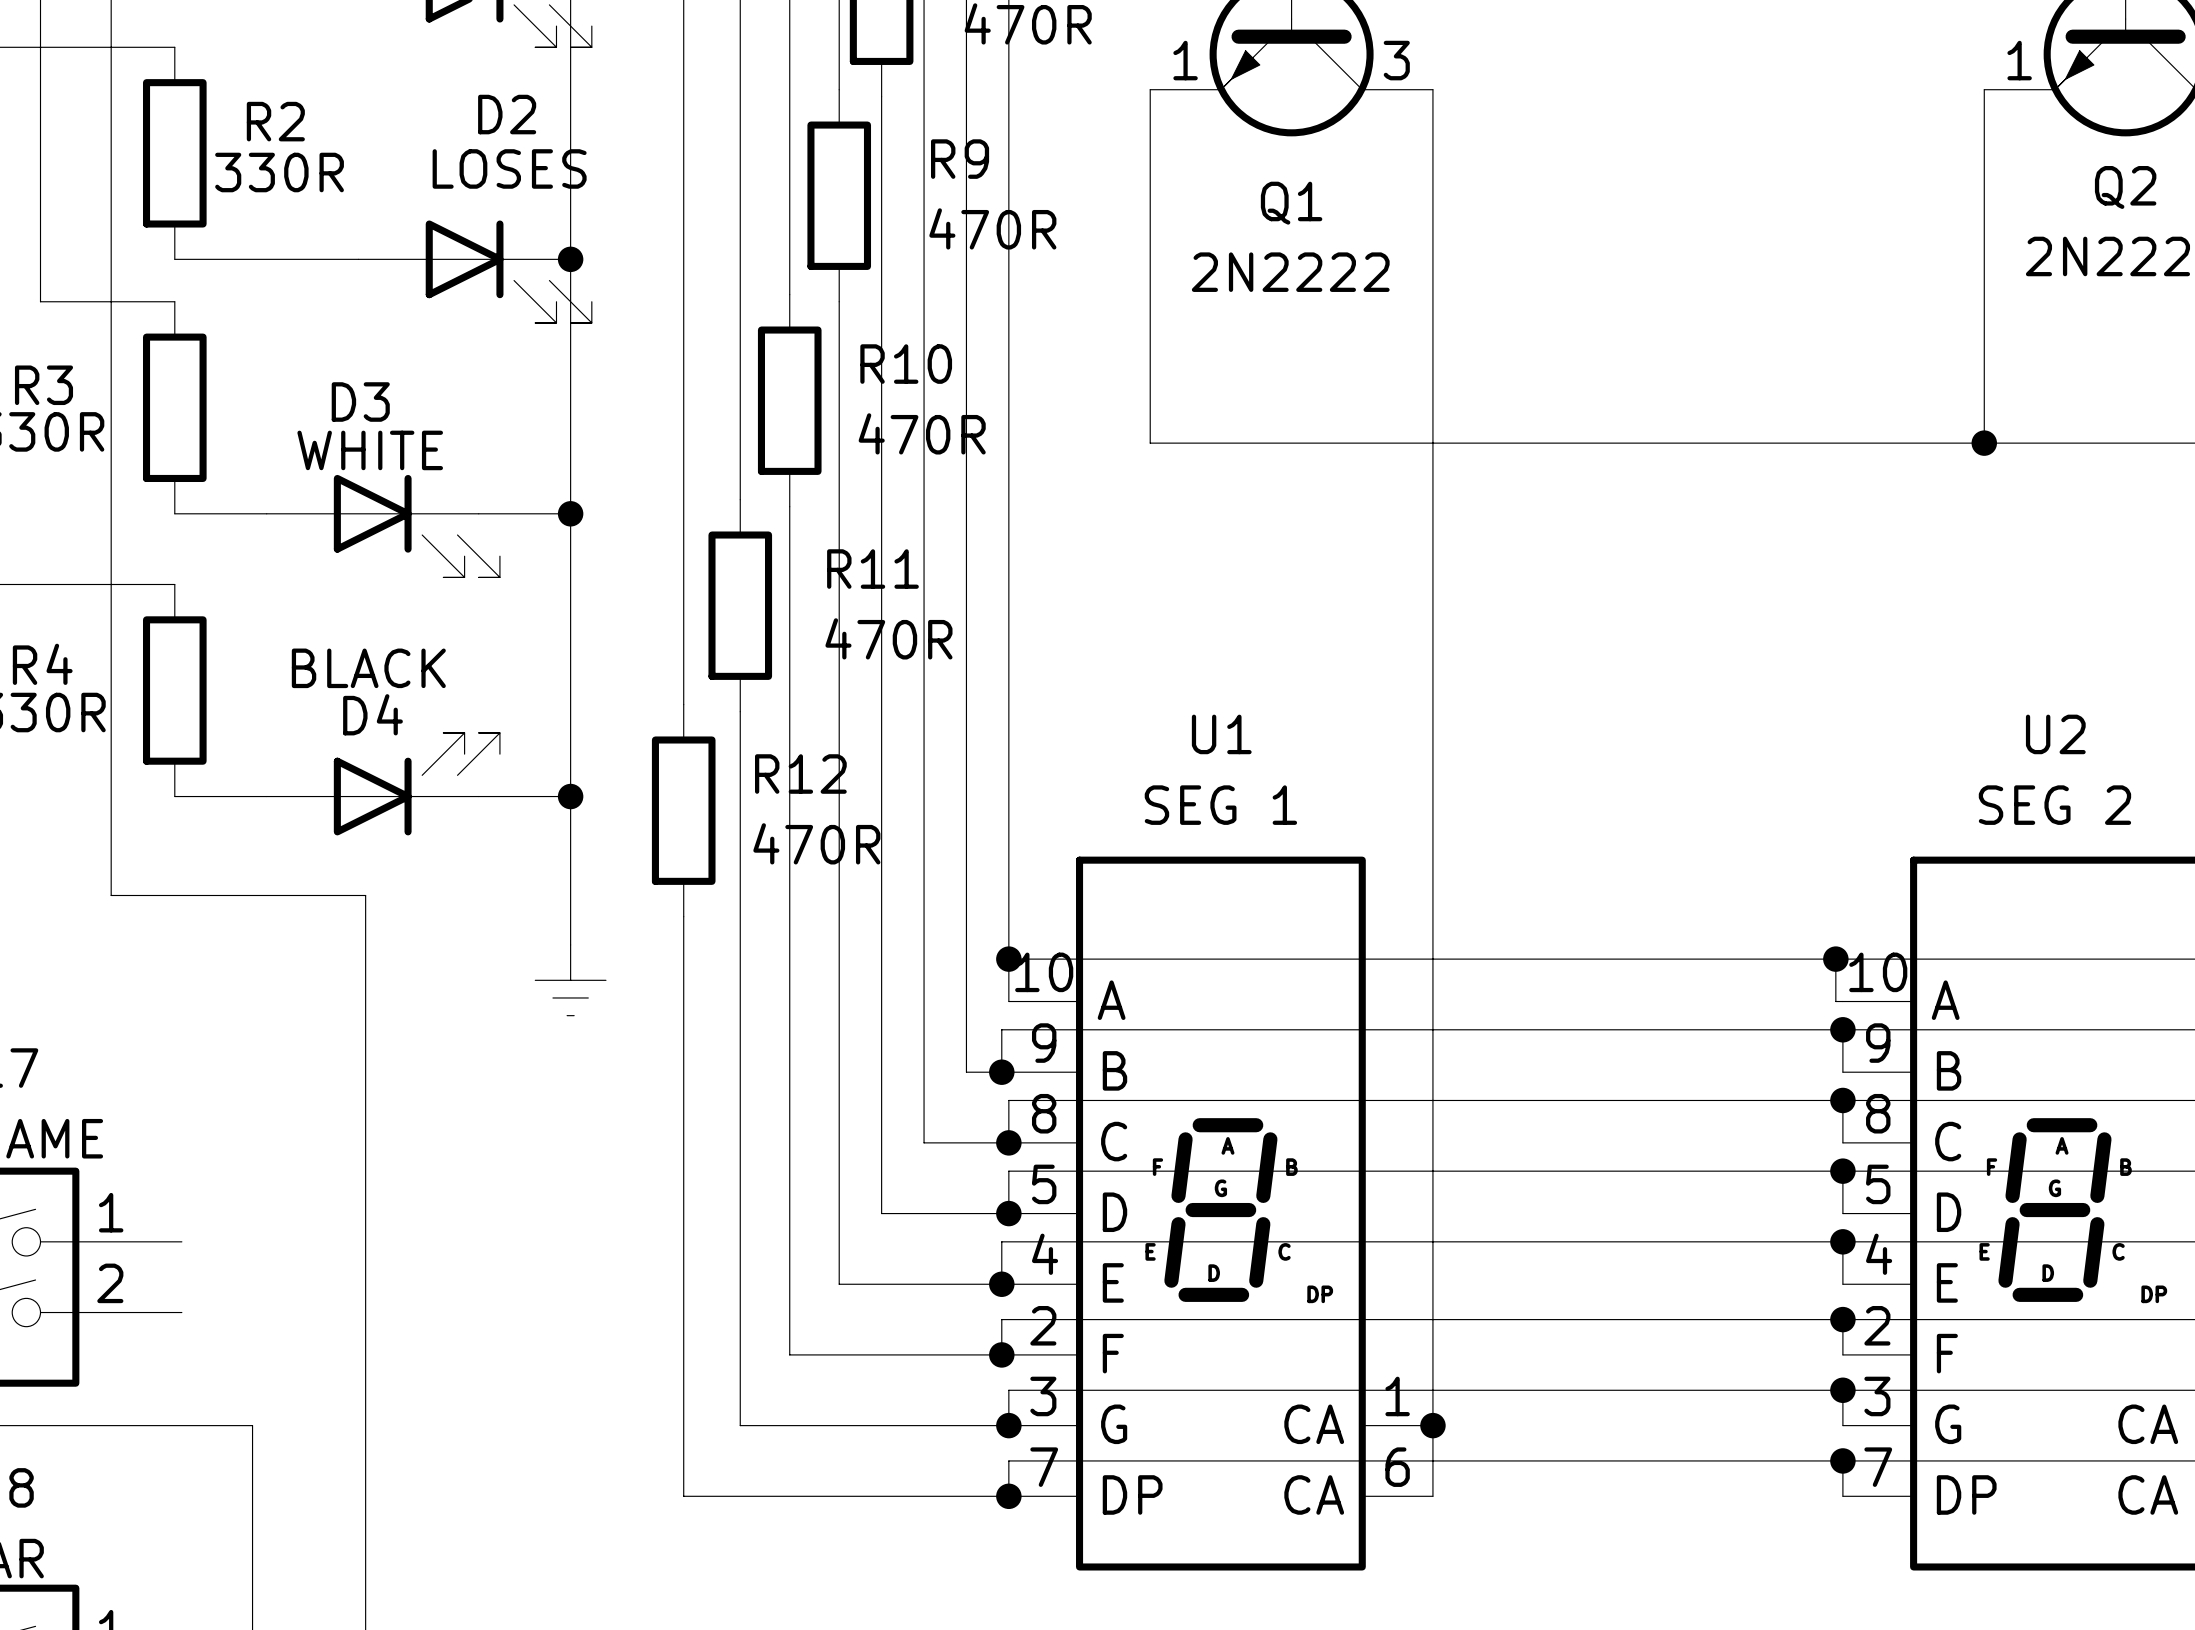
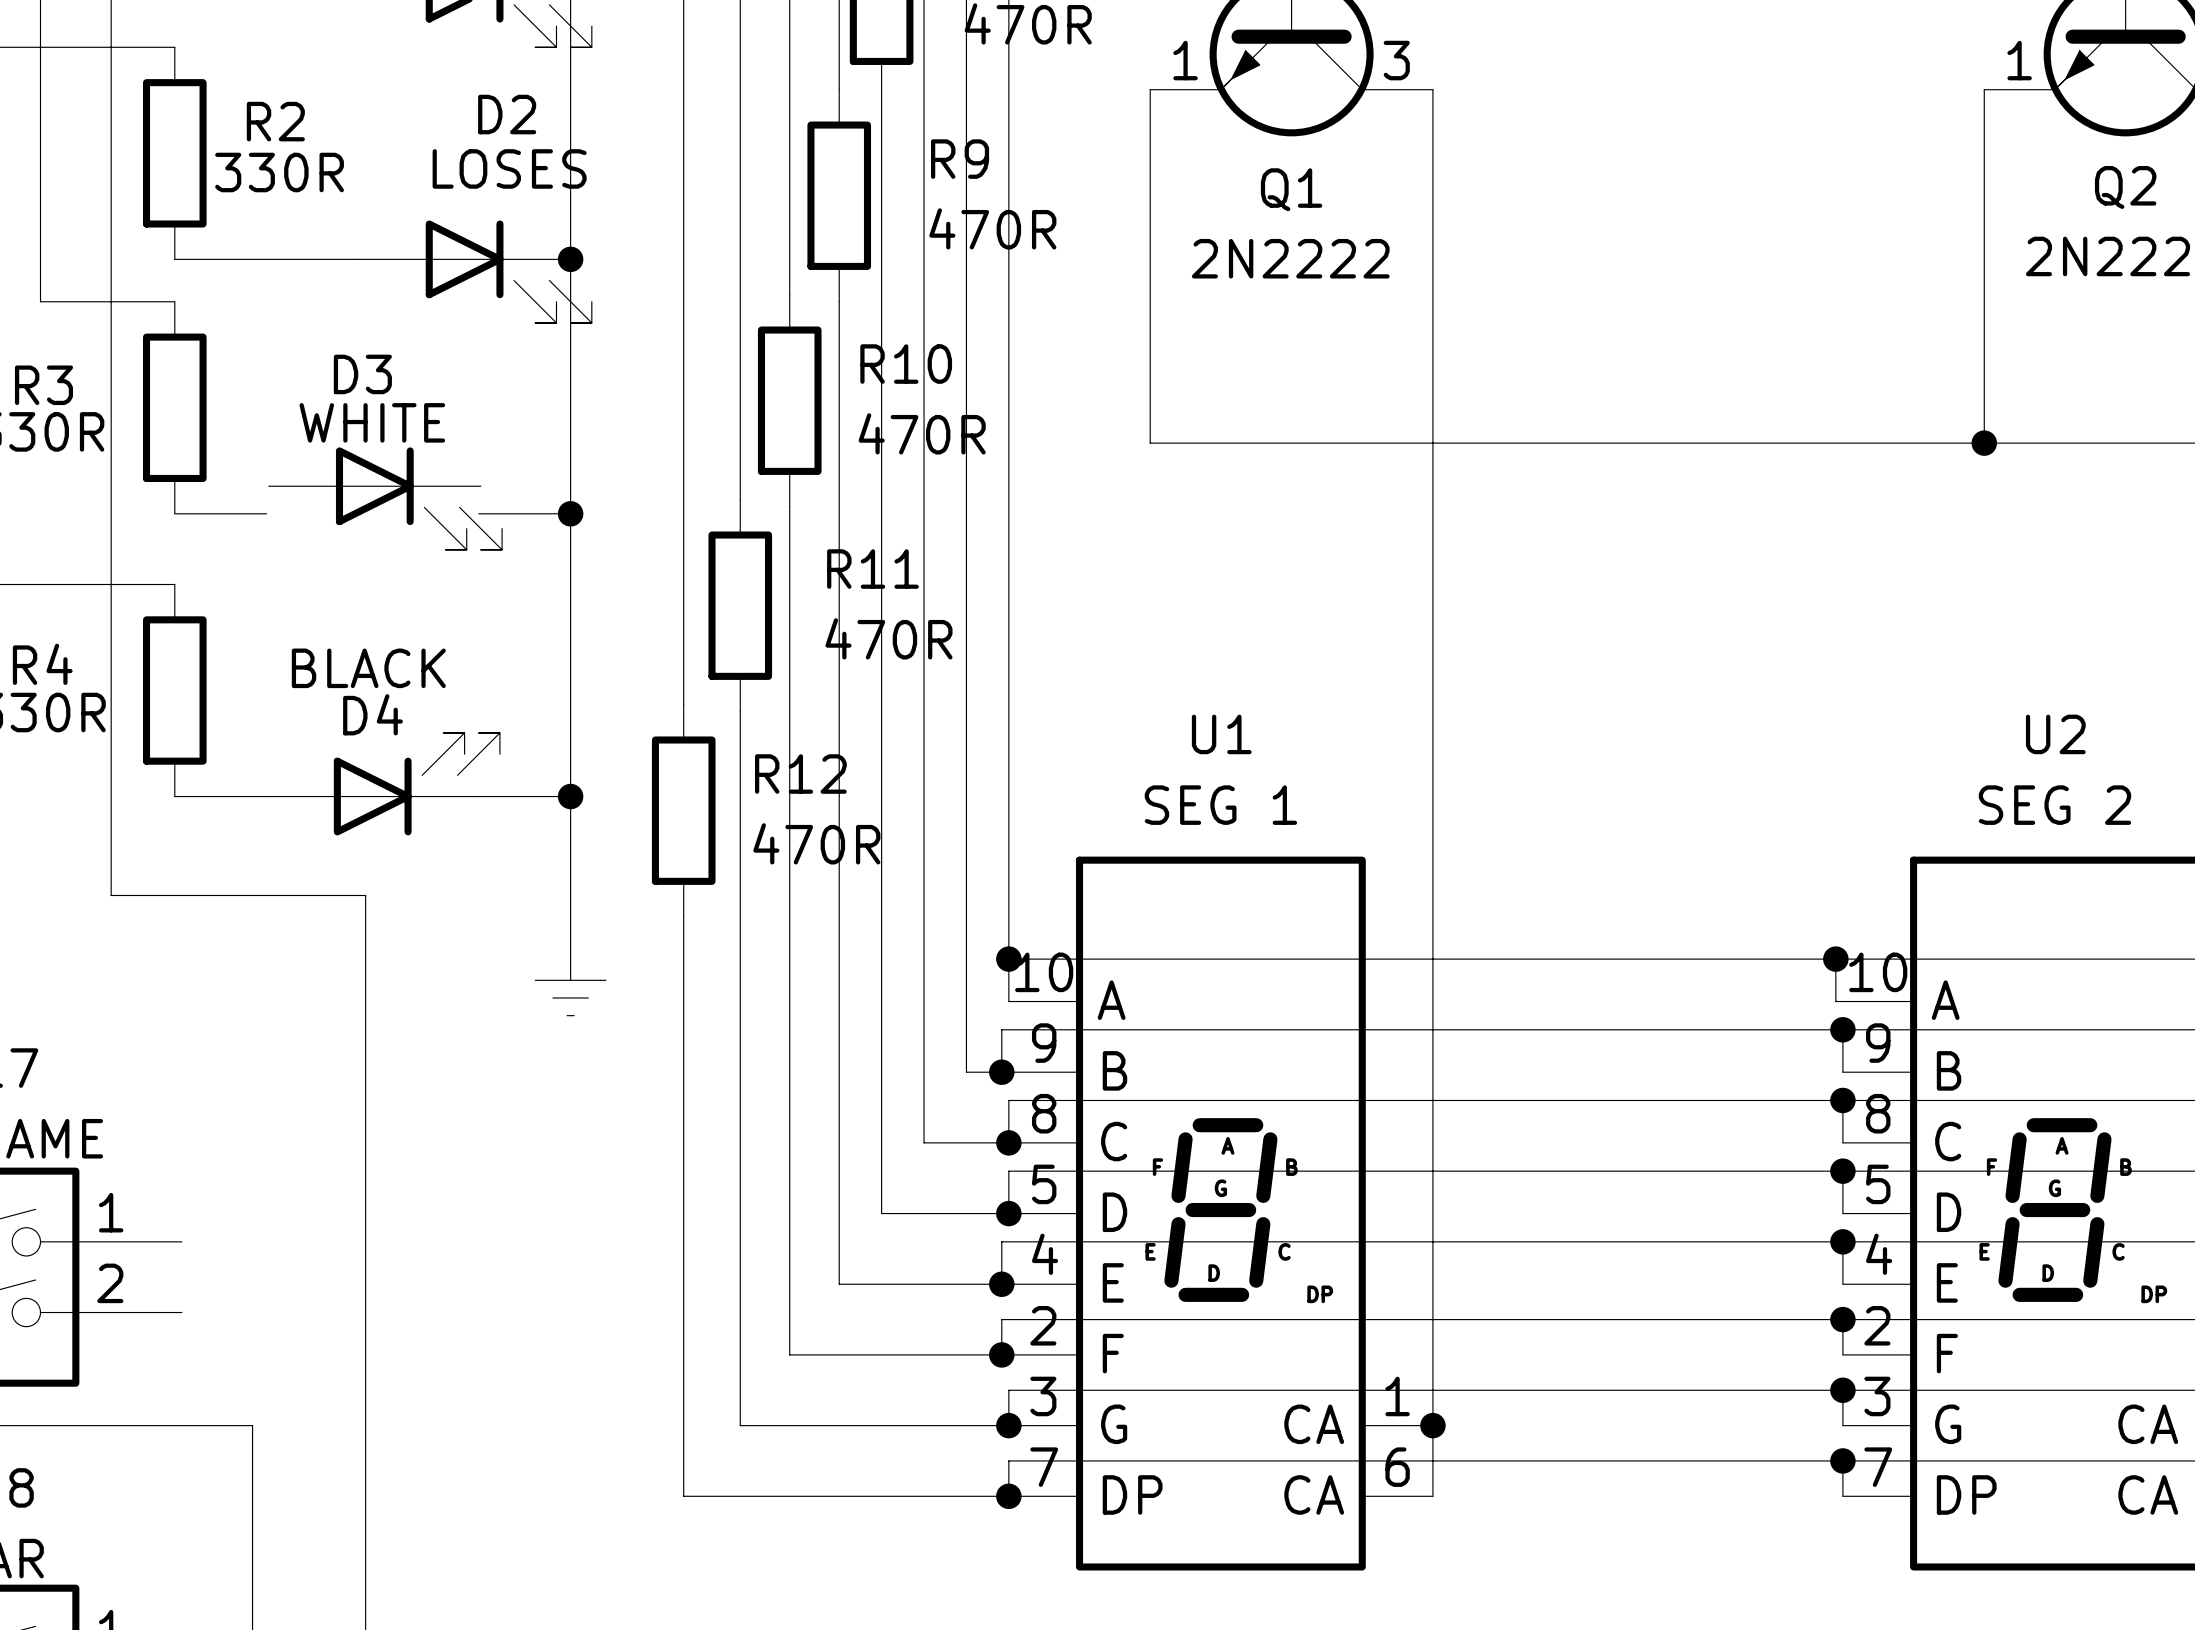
Q1 name position: Q1 (1291, 203) -> Q1 (1291, 189)
Q1 value position: 2N2222 (1290, 272) -> 2N2222 (1290, 258)
D3 position: (383, 526) -> (385, 498)

